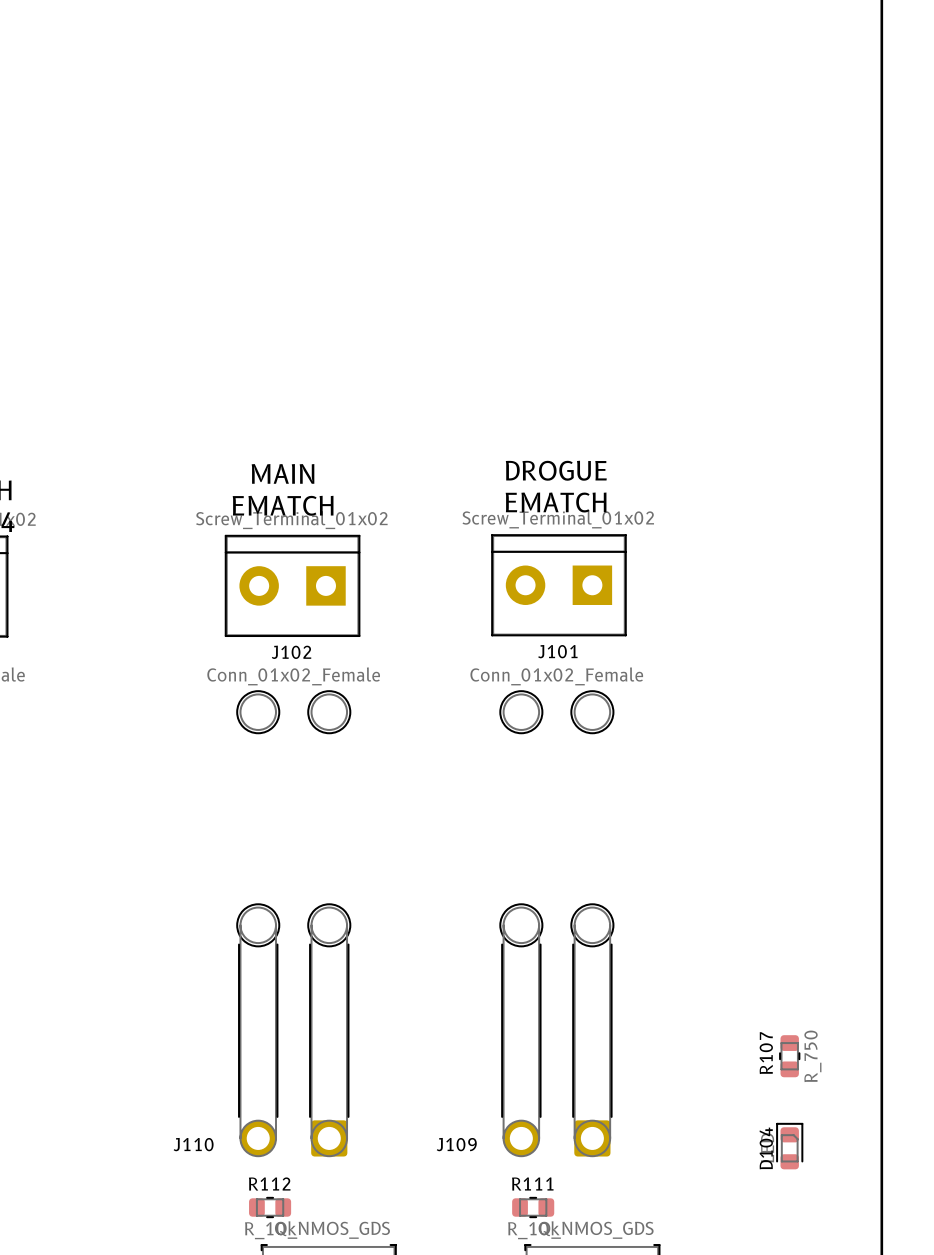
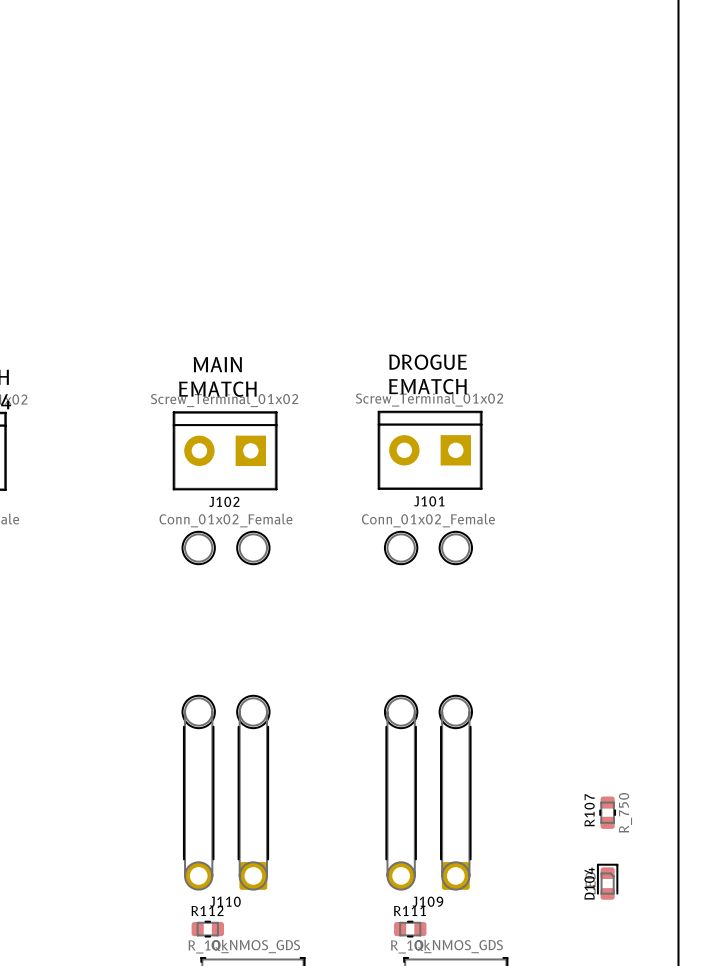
J110 name position: J110 (193, 1144) -> J110 (225, 901)
J109 name position: J109 (456, 1144) -> J109 (427, 901)

